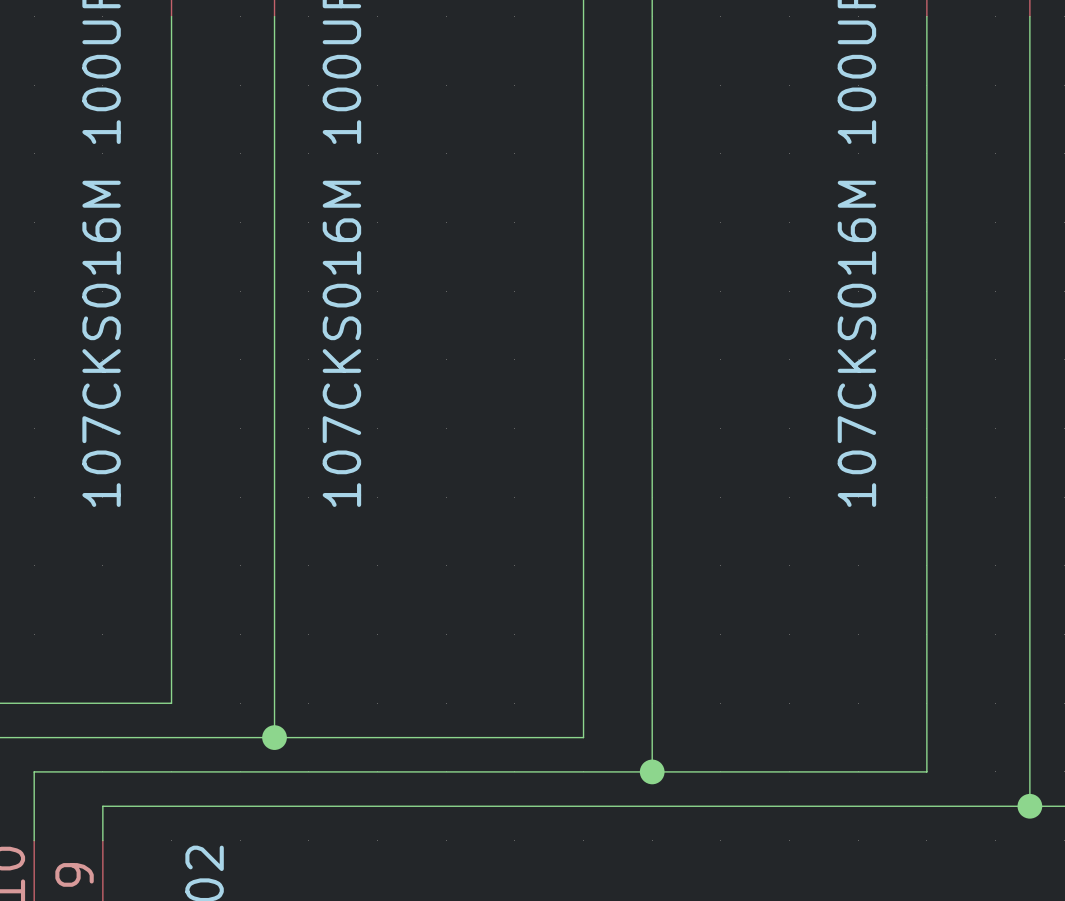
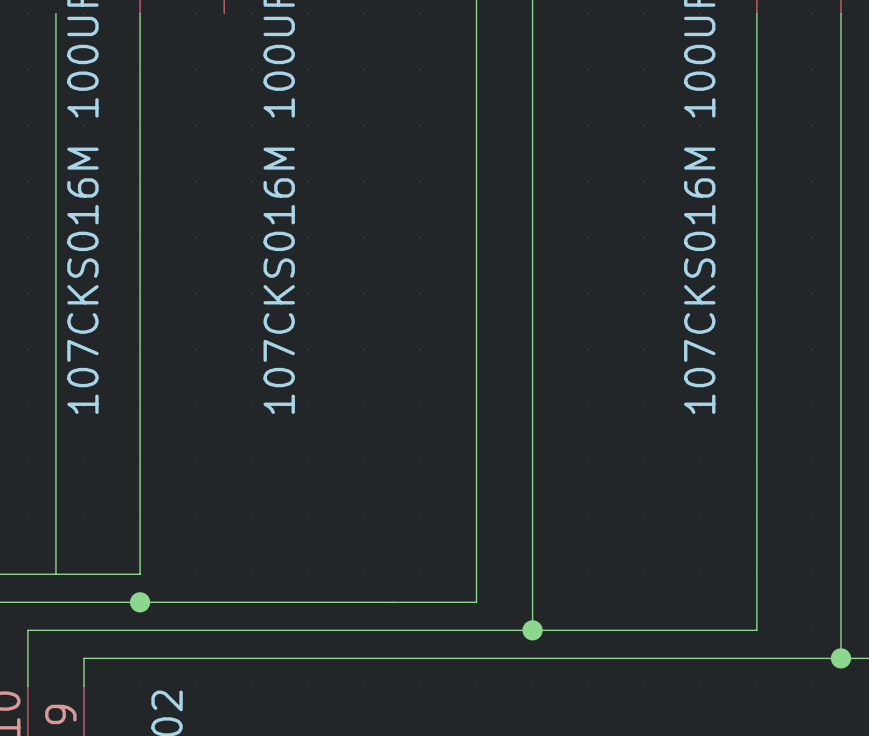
wire: none -> (55, 13) (55, 574)
wire: (274, 16) (274, 737) -> none
junction position: (274, 737) -> (140, 602)

